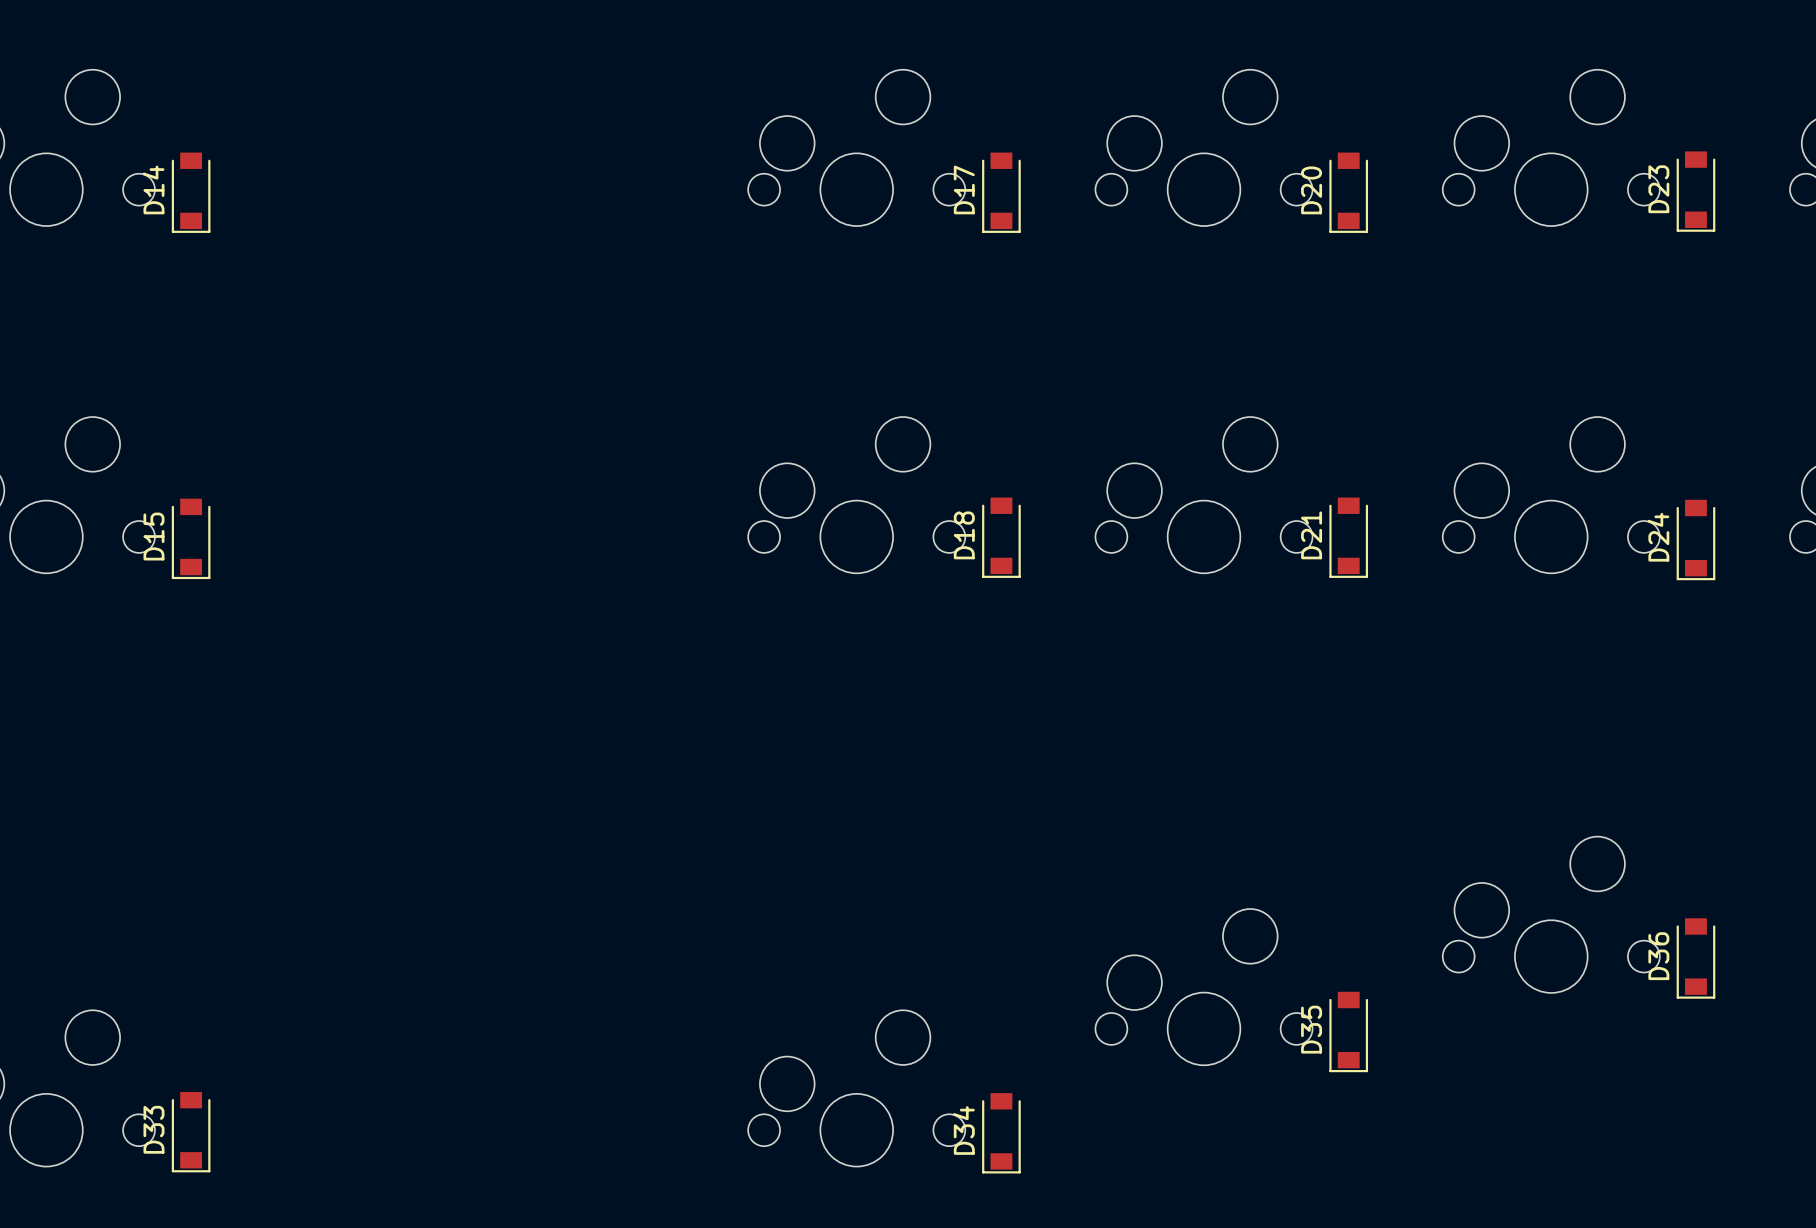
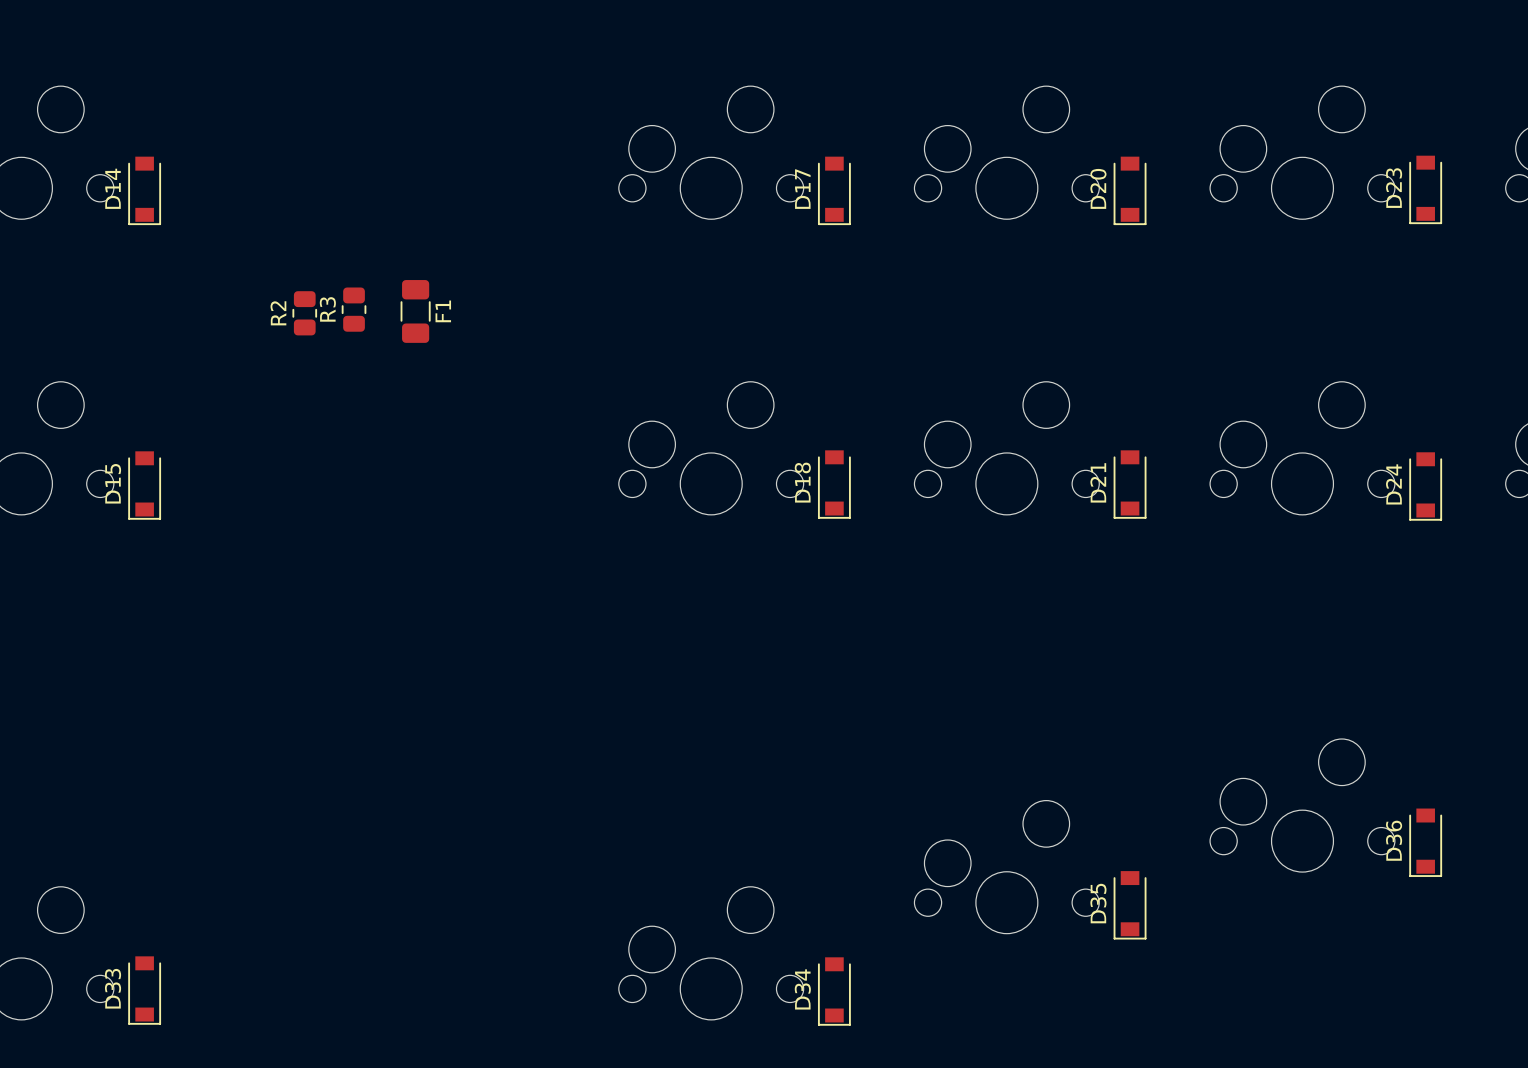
R3: none -> (354, 309)
F1: none -> (415, 311)
R2: none -> (304, 313)

